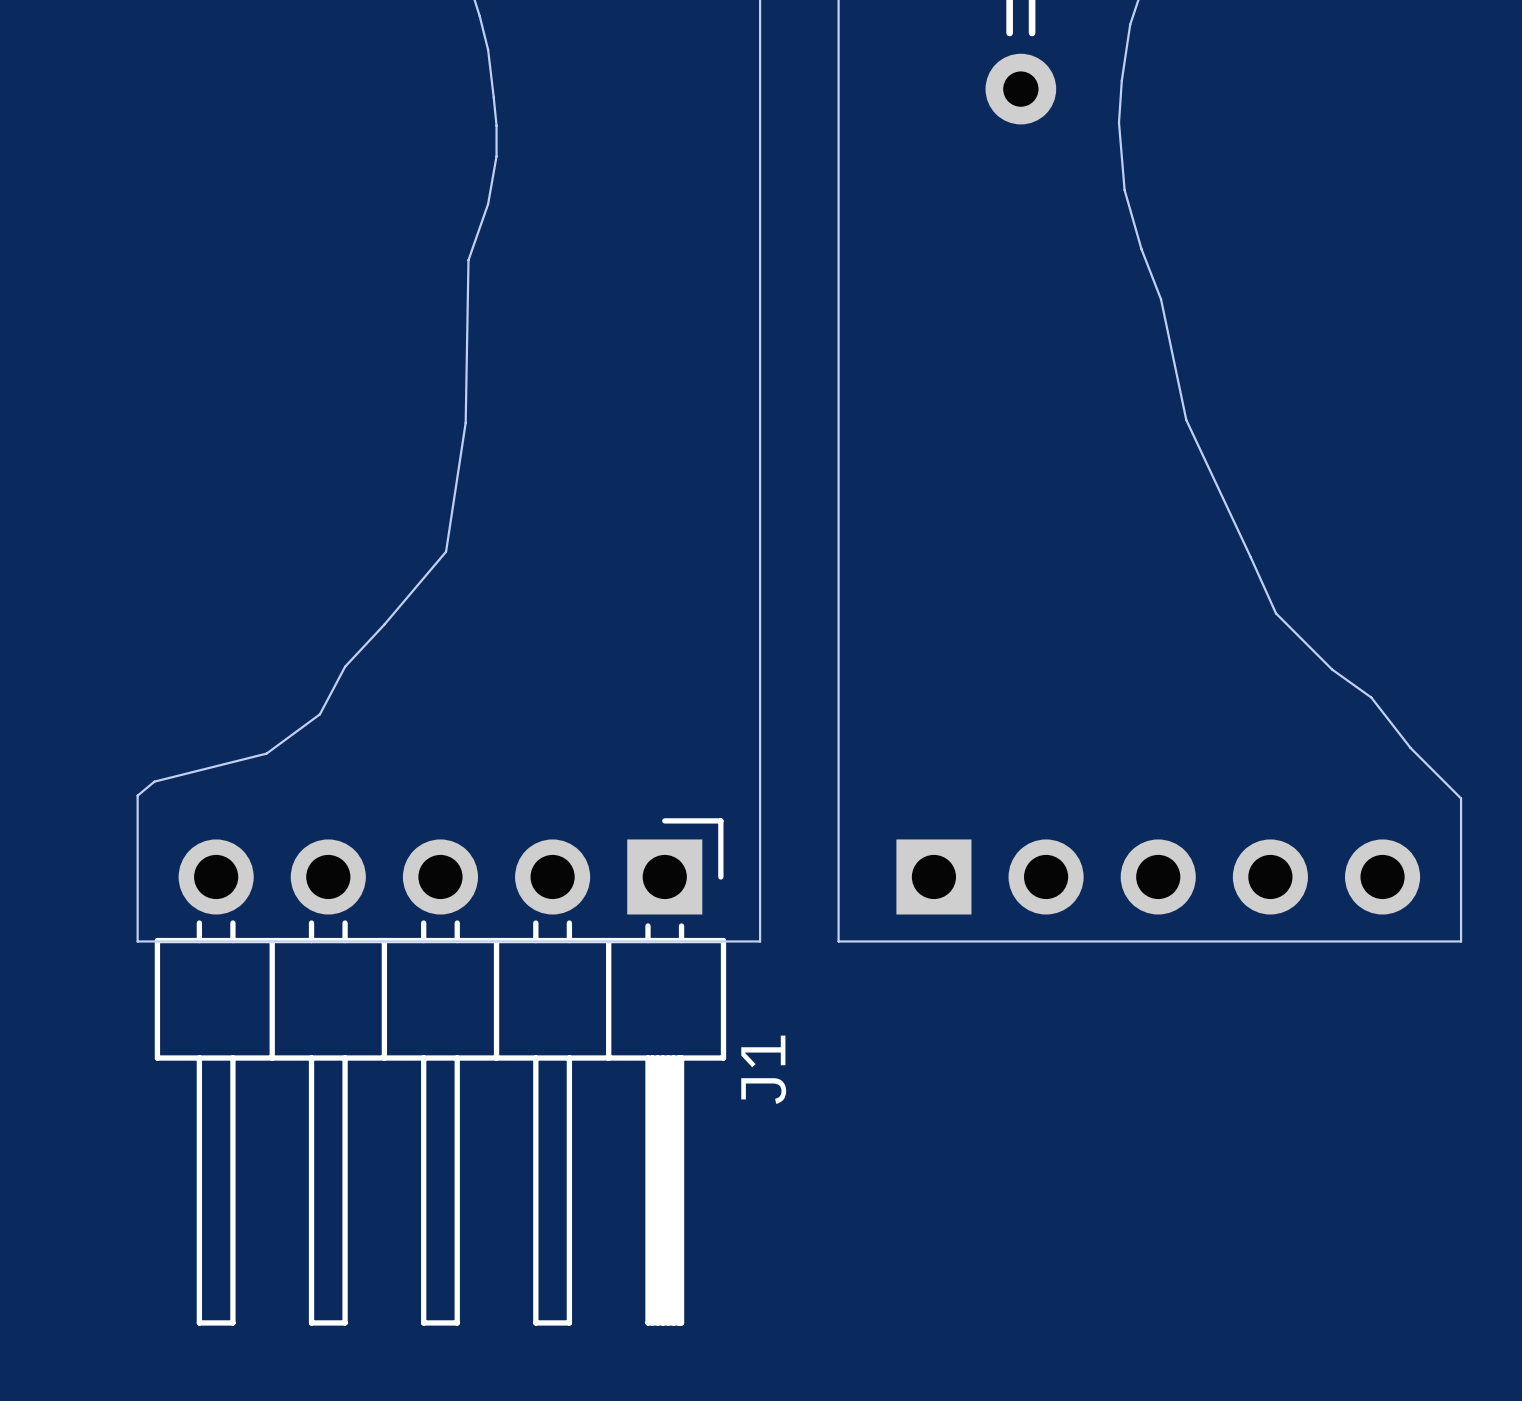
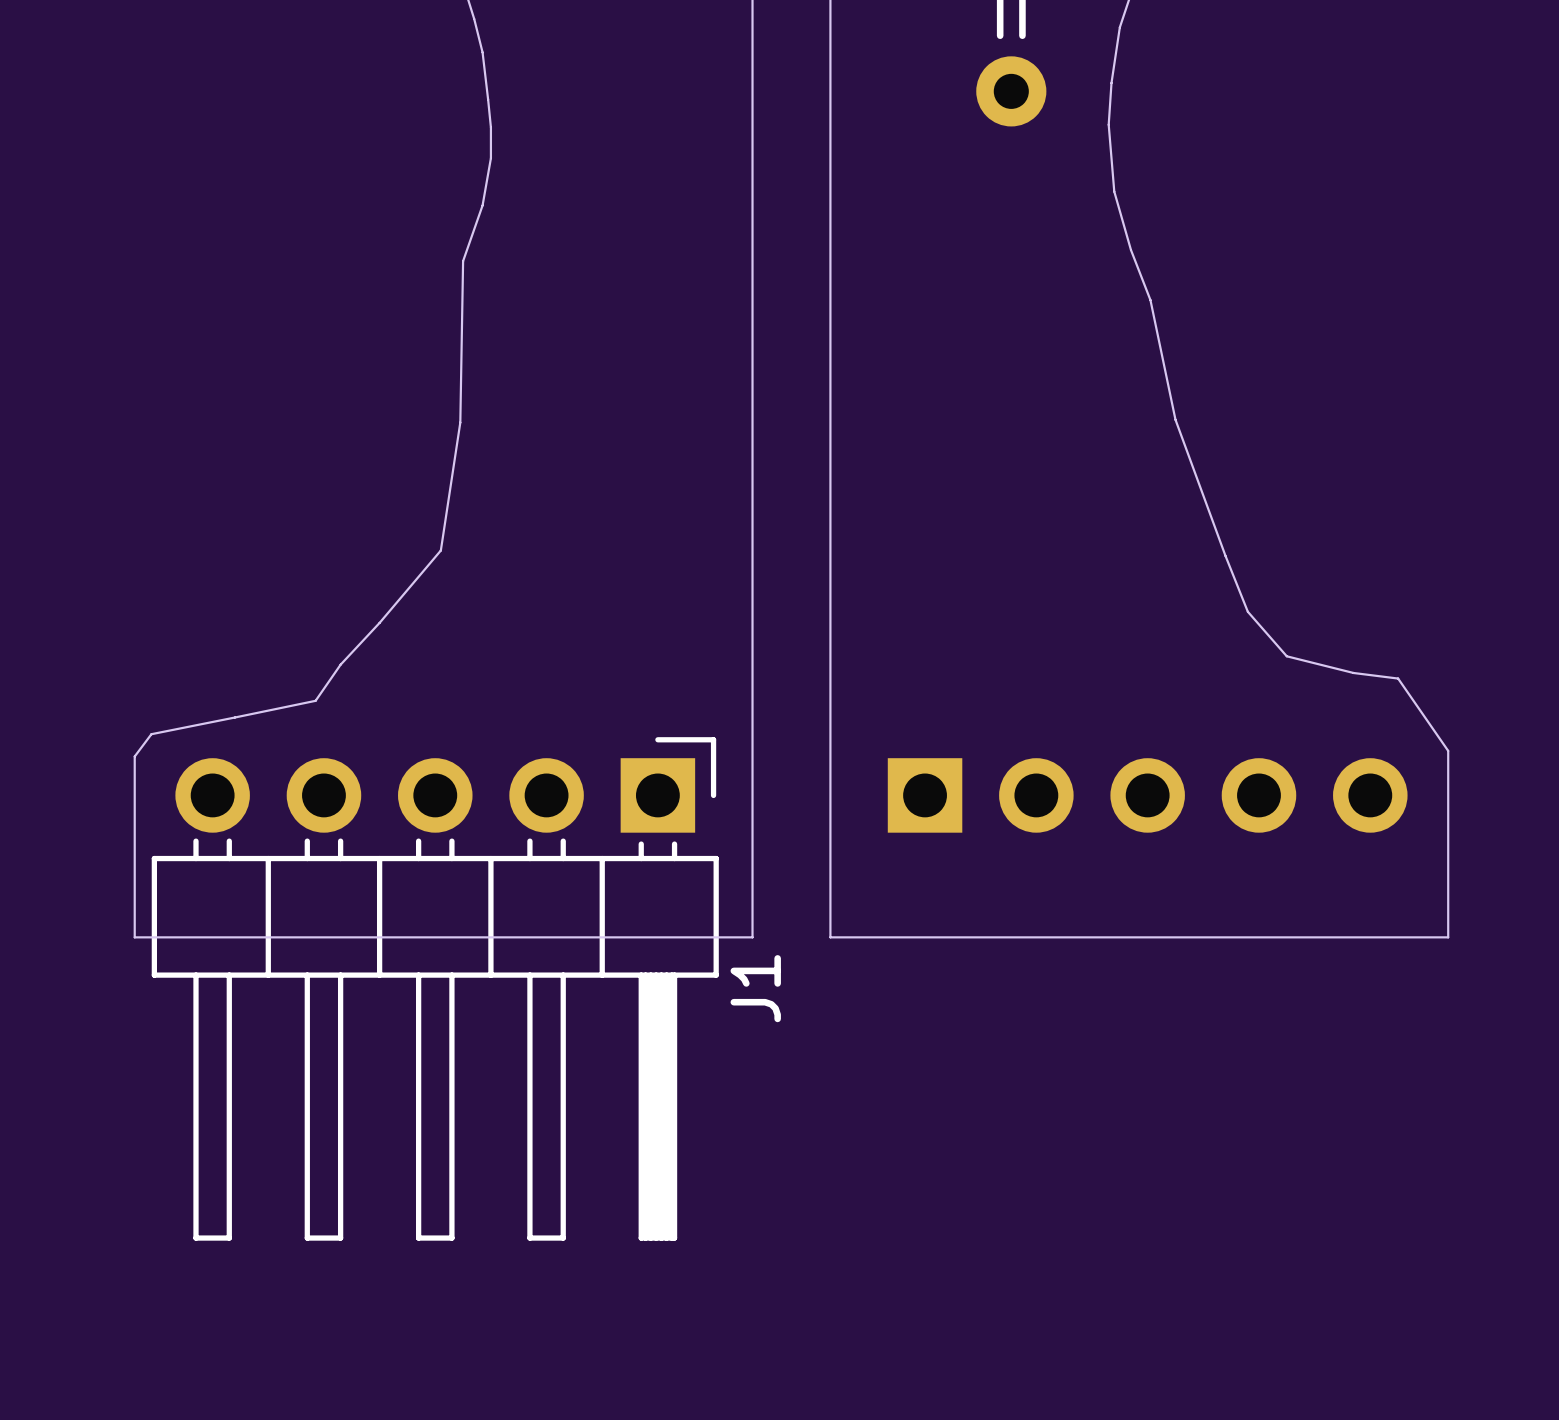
board edge: (1186, 419) (1276, 613) (1332, 669) (1371, 697) (1410, 748) (1461, 798) -> (1175, 419) (1247, 611) (1286, 656) (1353, 672) (1398, 678) (1448, 750) (1448, 795)
board edge: (345, 666) (319, 714) (266, 753) (154, 781) (137, 795) -> (340, 664) (315, 700) (151, 734) (134, 756) (134, 792)
part position: (1158, 876) -> (1147, 795)
J1 position: (440, 1071) -> (435, 988)

